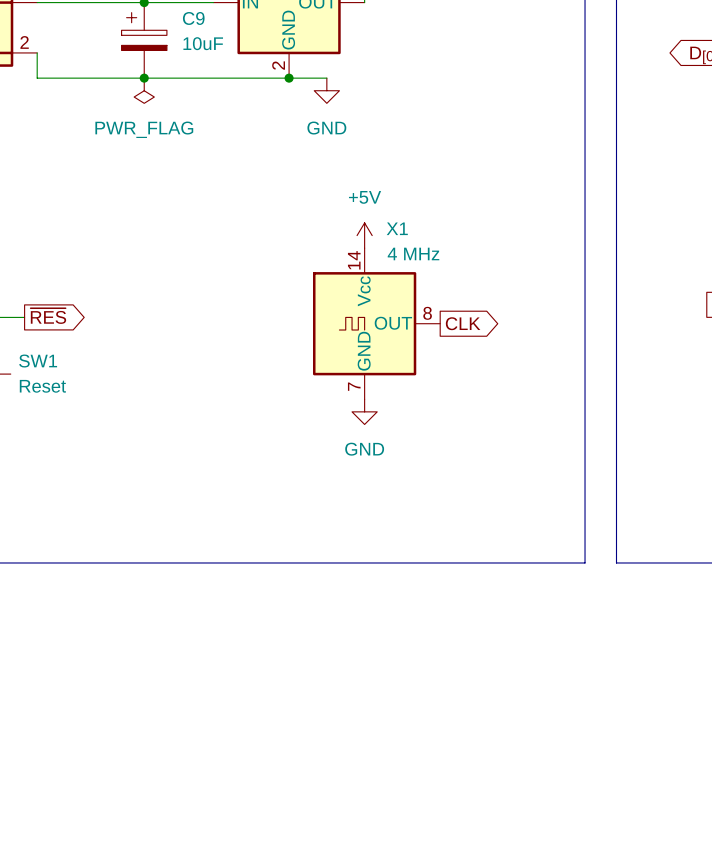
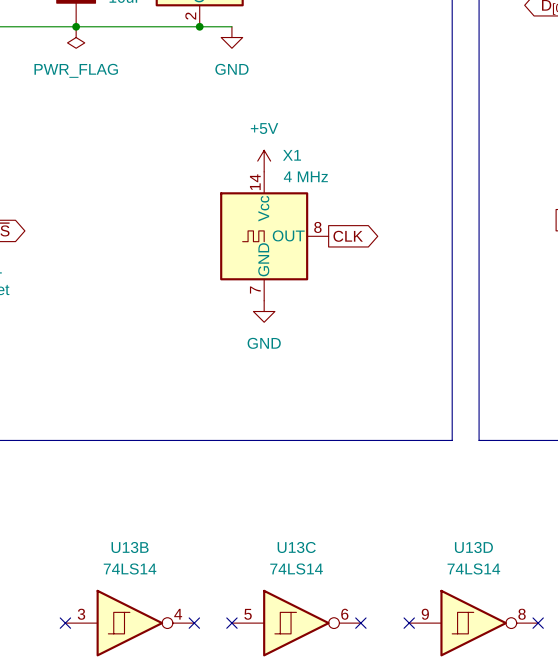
no-connect mark: none -> (65, 623)
U13B: none -> 74LS14 (129, 623)
no-connect mark: none -> (194, 623)
no-connect mark: none -> (231, 623)
U13C: none -> 74LS14 (296, 623)
no-connect mark: none -> (360, 623)
no-connect mark: none -> (409, 623)
U13D: none -> 74LS14 (473, 623)
no-connect mark: none -> (538, 623)

